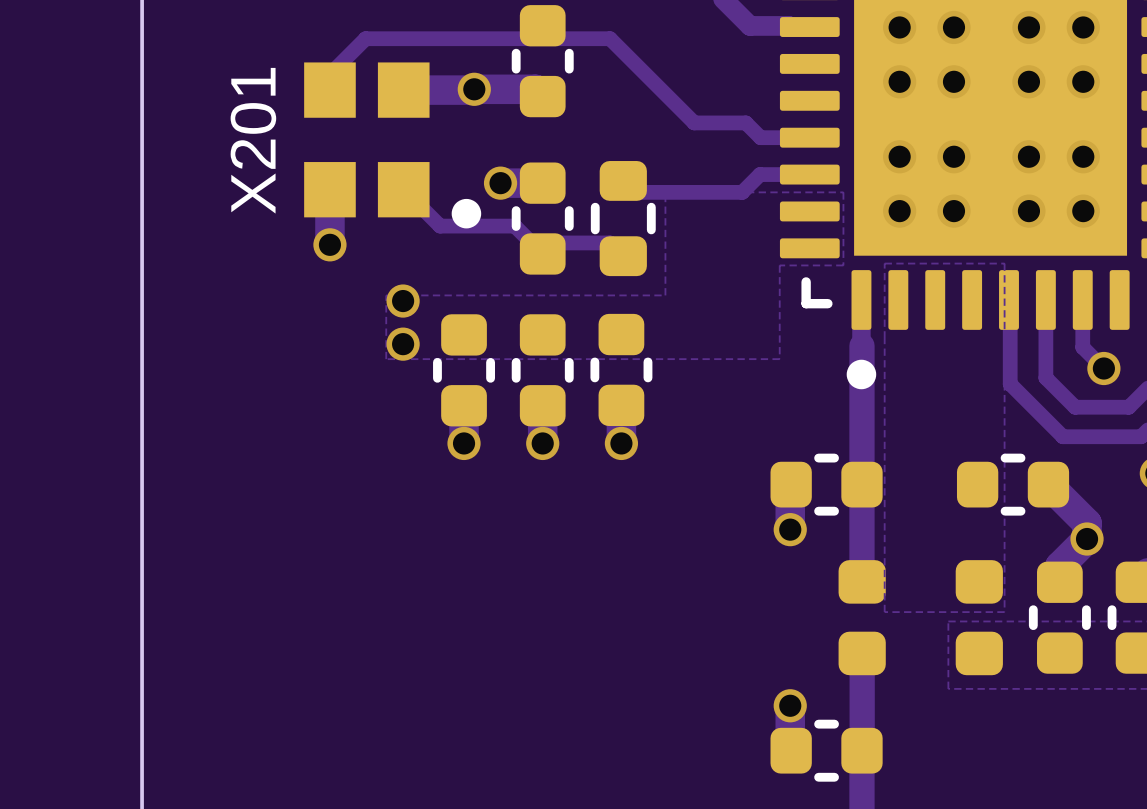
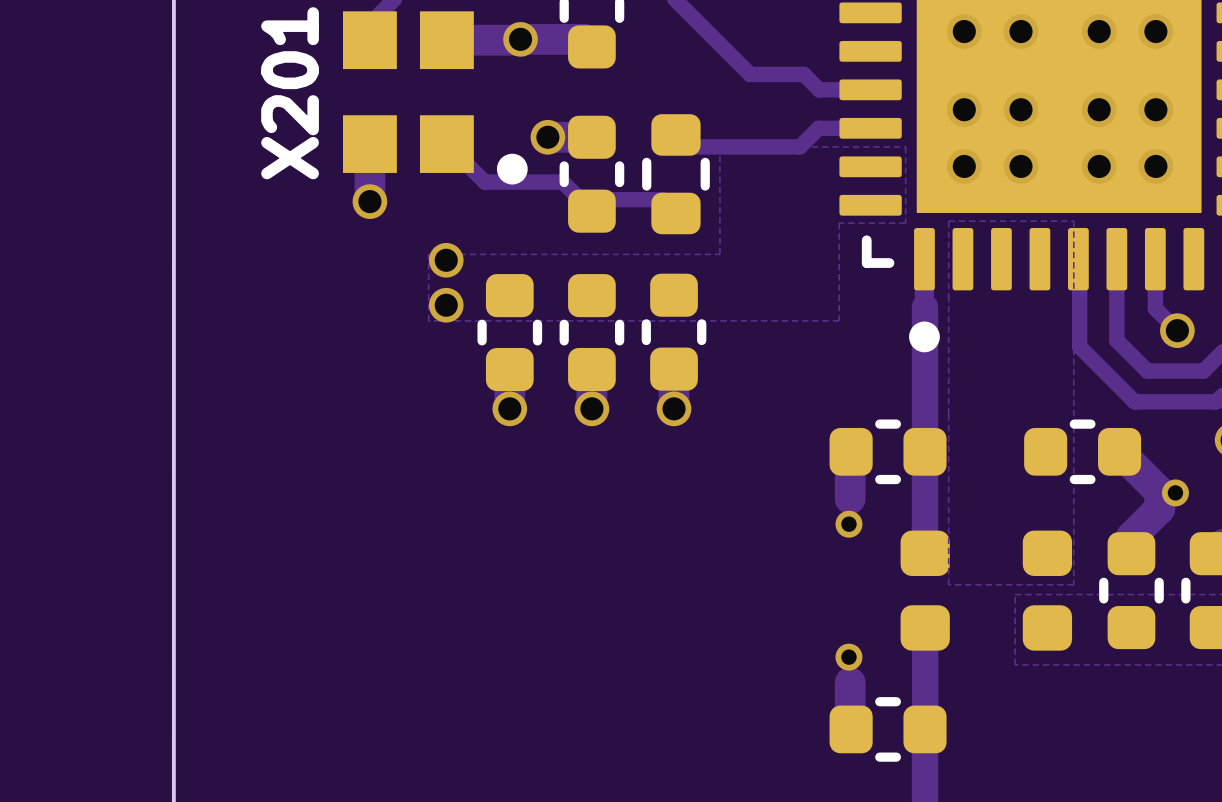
via position: (790, 529) -> (848, 524)
via position: (1087, 539) -> (1175, 492)
via position: (790, 705) -> (848, 657)

